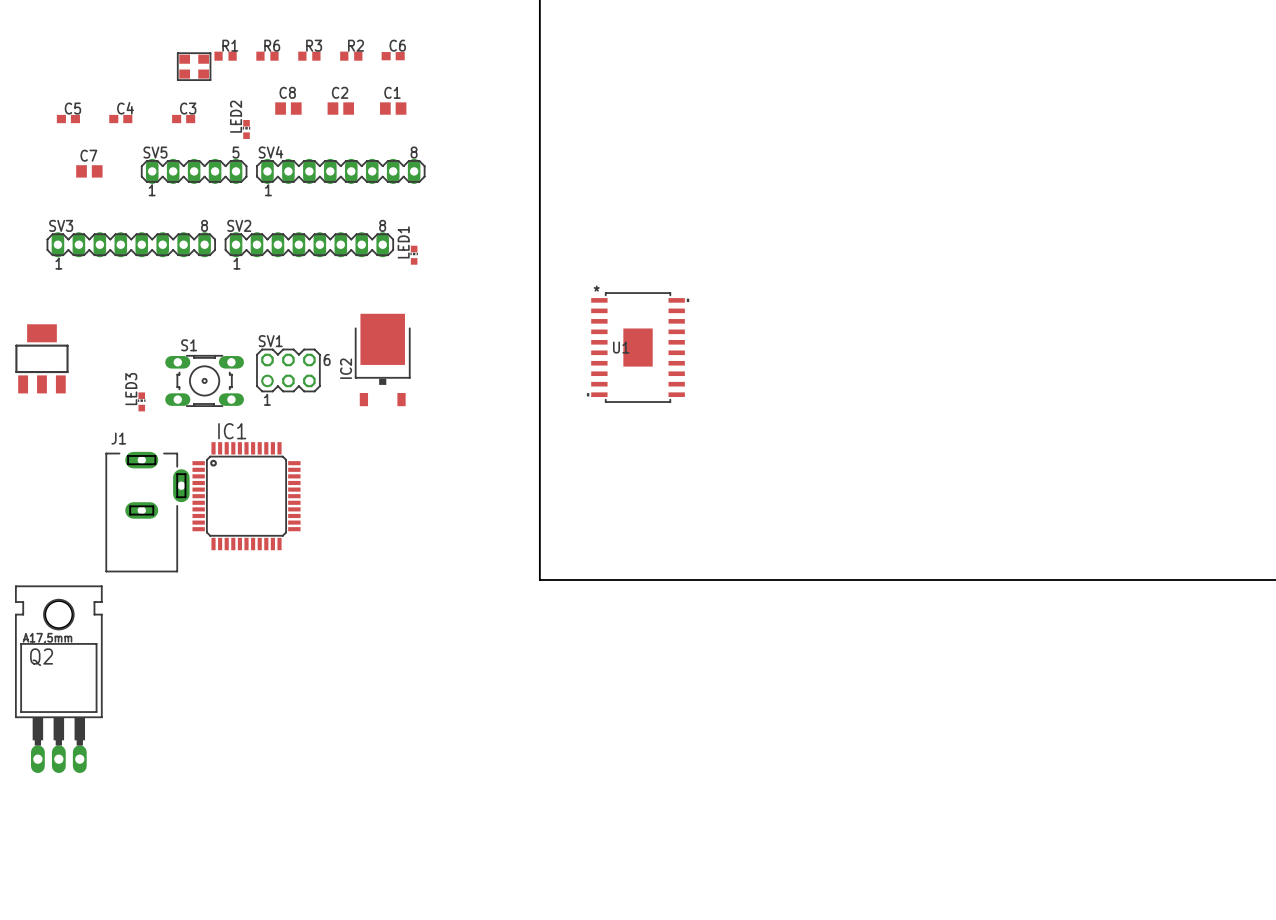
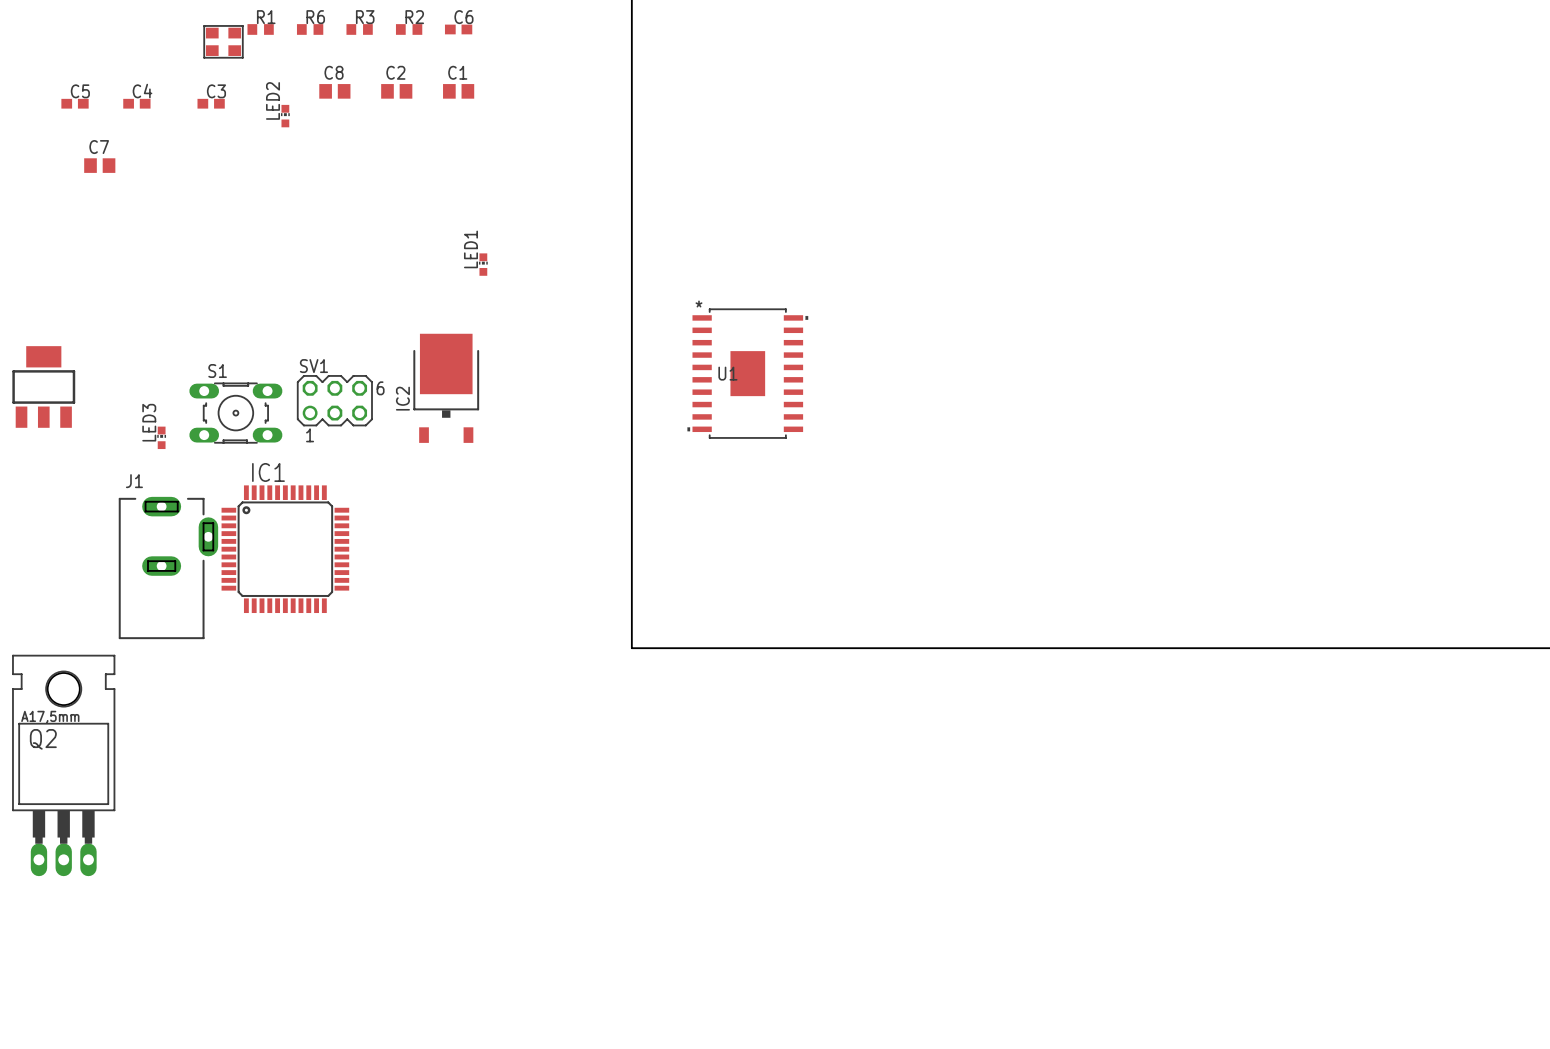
SV5: (194, 171) -> none
SV4: (340, 171) -> none
SV3: (131, 244) -> none
SV2: (309, 244) -> none

